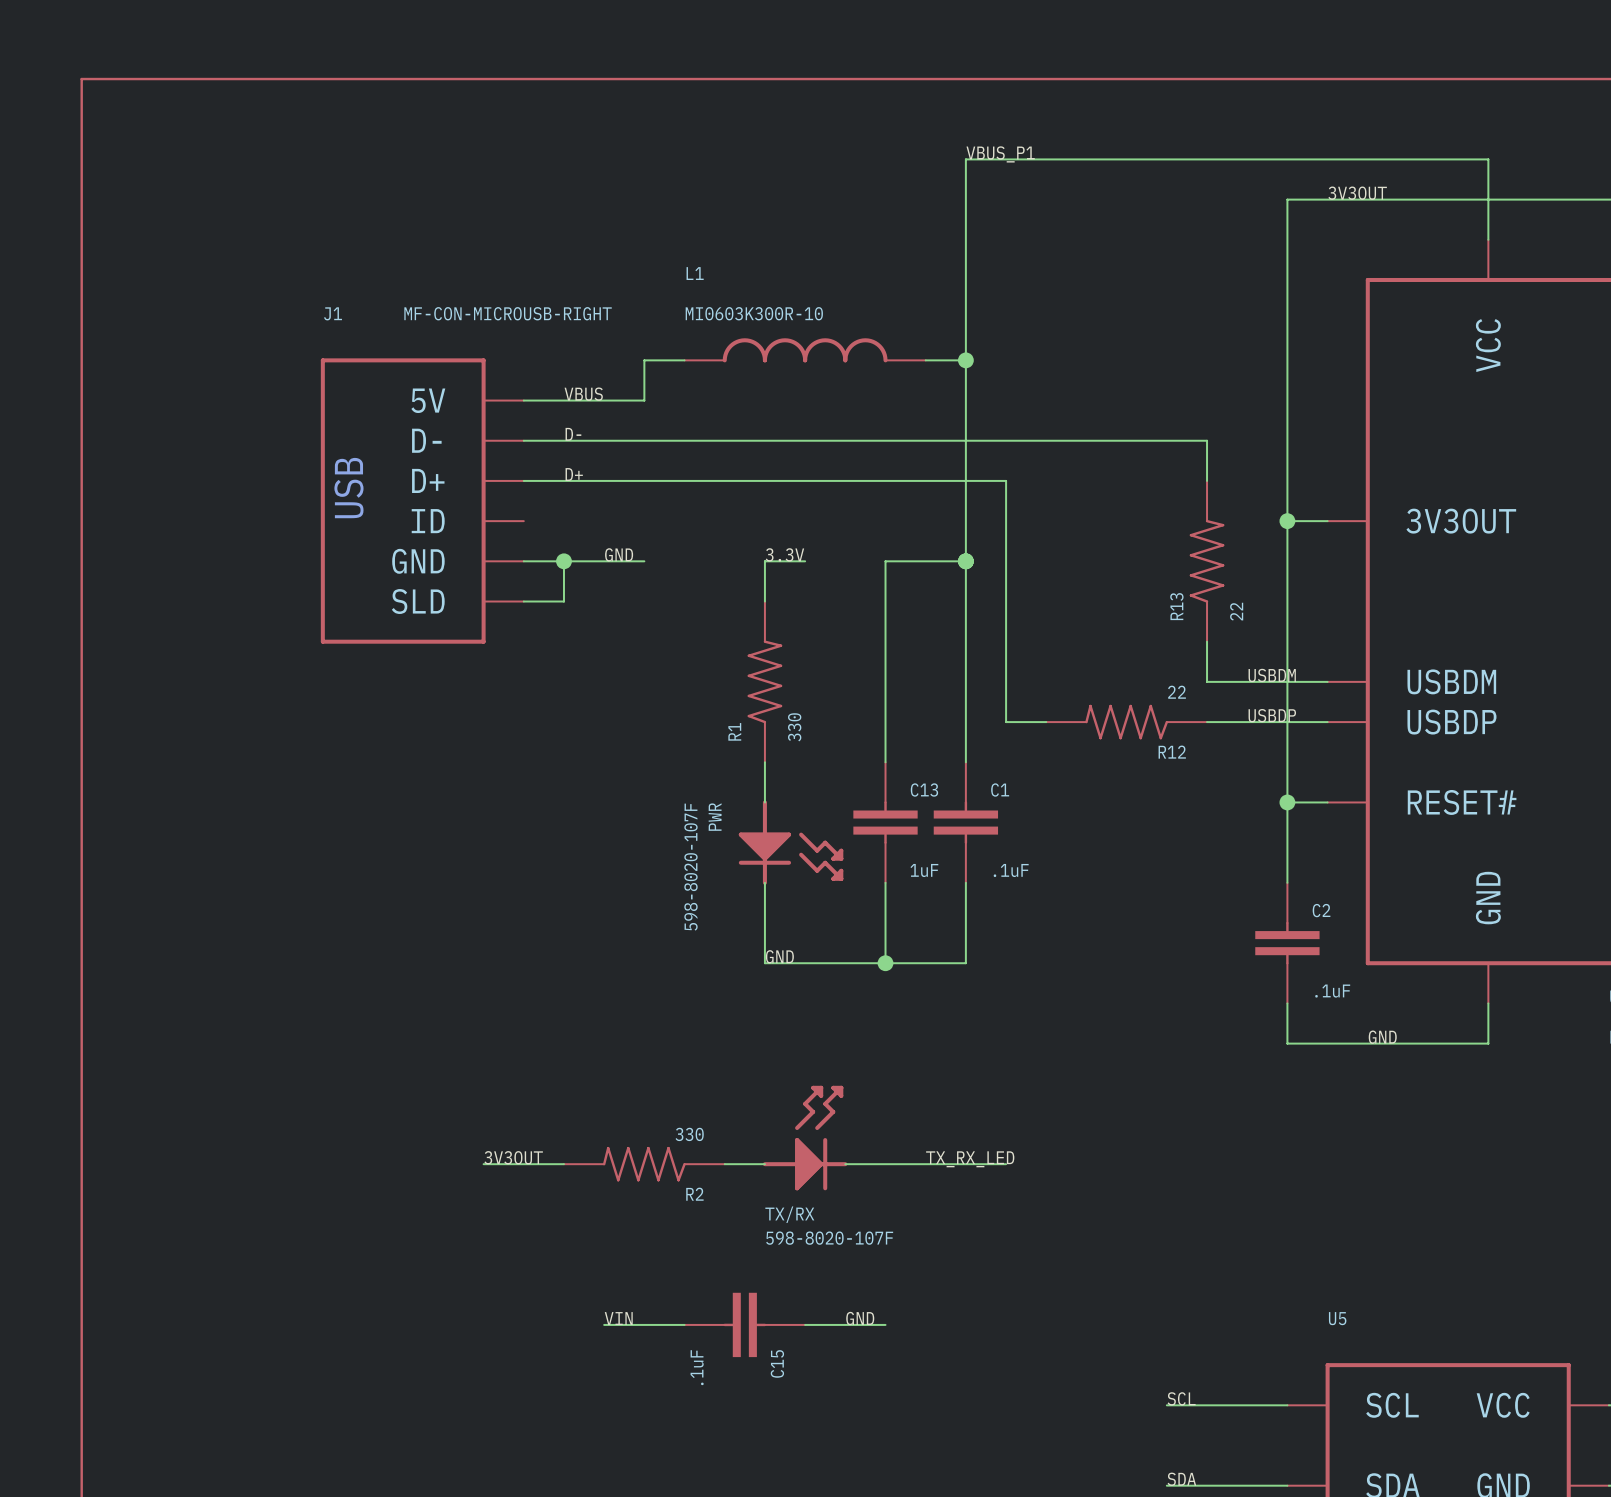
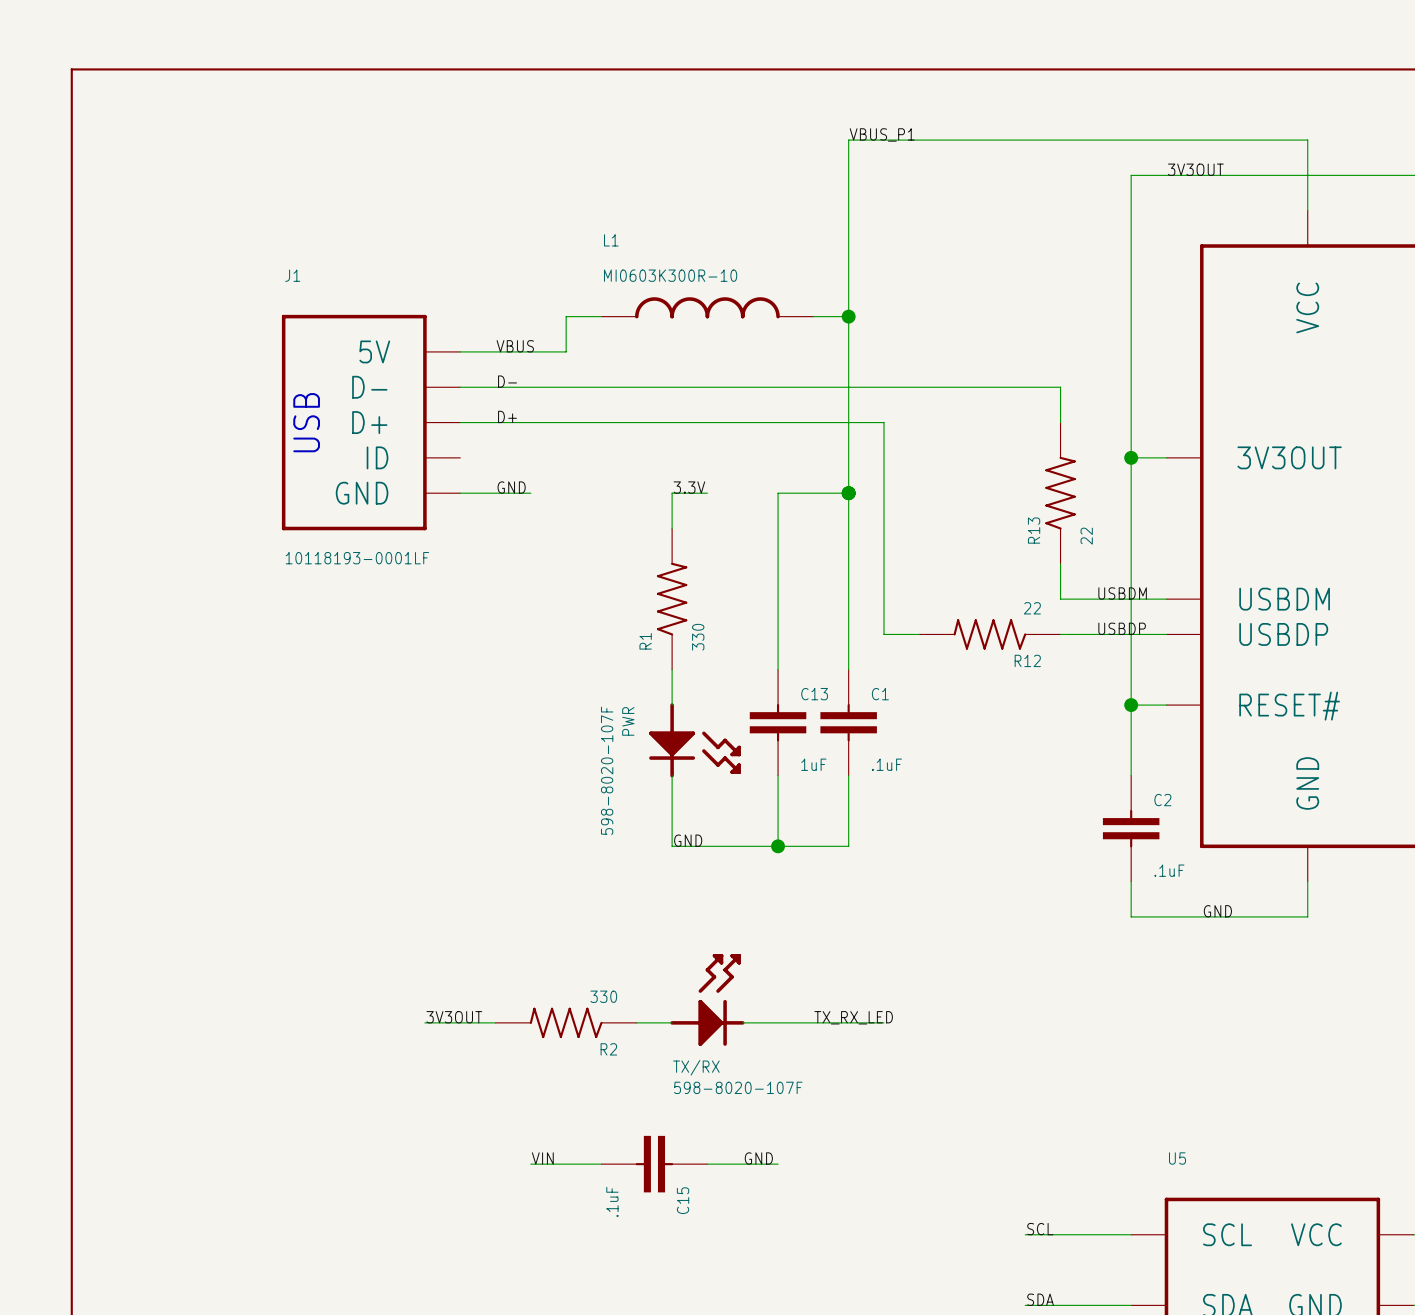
J1 value: MF-CON-MICROUSB-RIGHT (508, 313) -> 10118193-0001LF (357, 558)
J1 symbol: [320, 358, 524, 644] -> [281, 314, 461, 531]
label position: GND (619, 554) -> GND (511, 487)
wire: (563, 561) (563, 601) (523, 601) -> none
junction: (563, 561) -> none
wire: (604, 561) (644, 561) -> none

